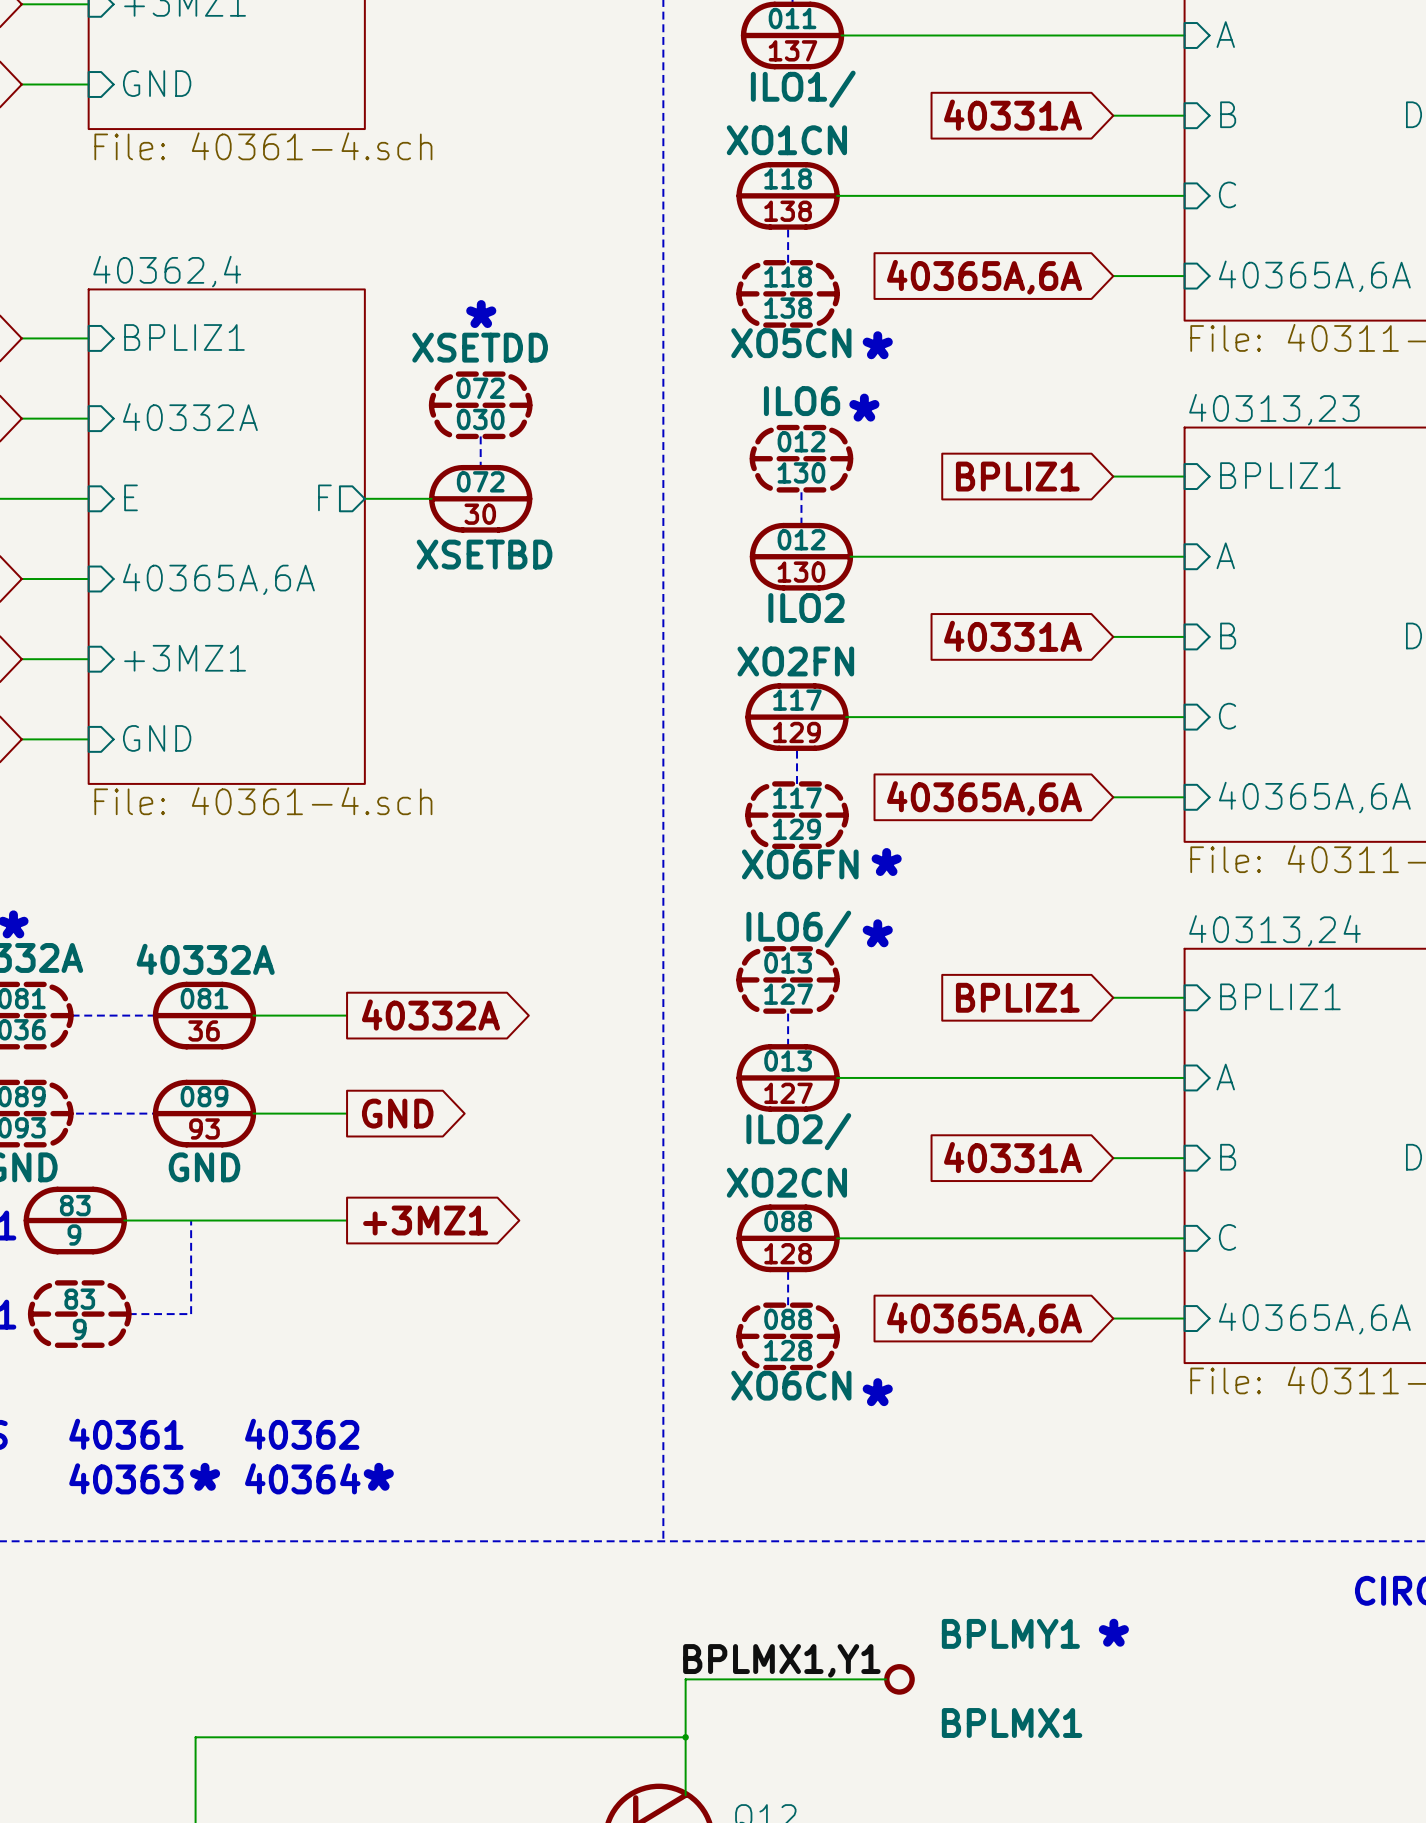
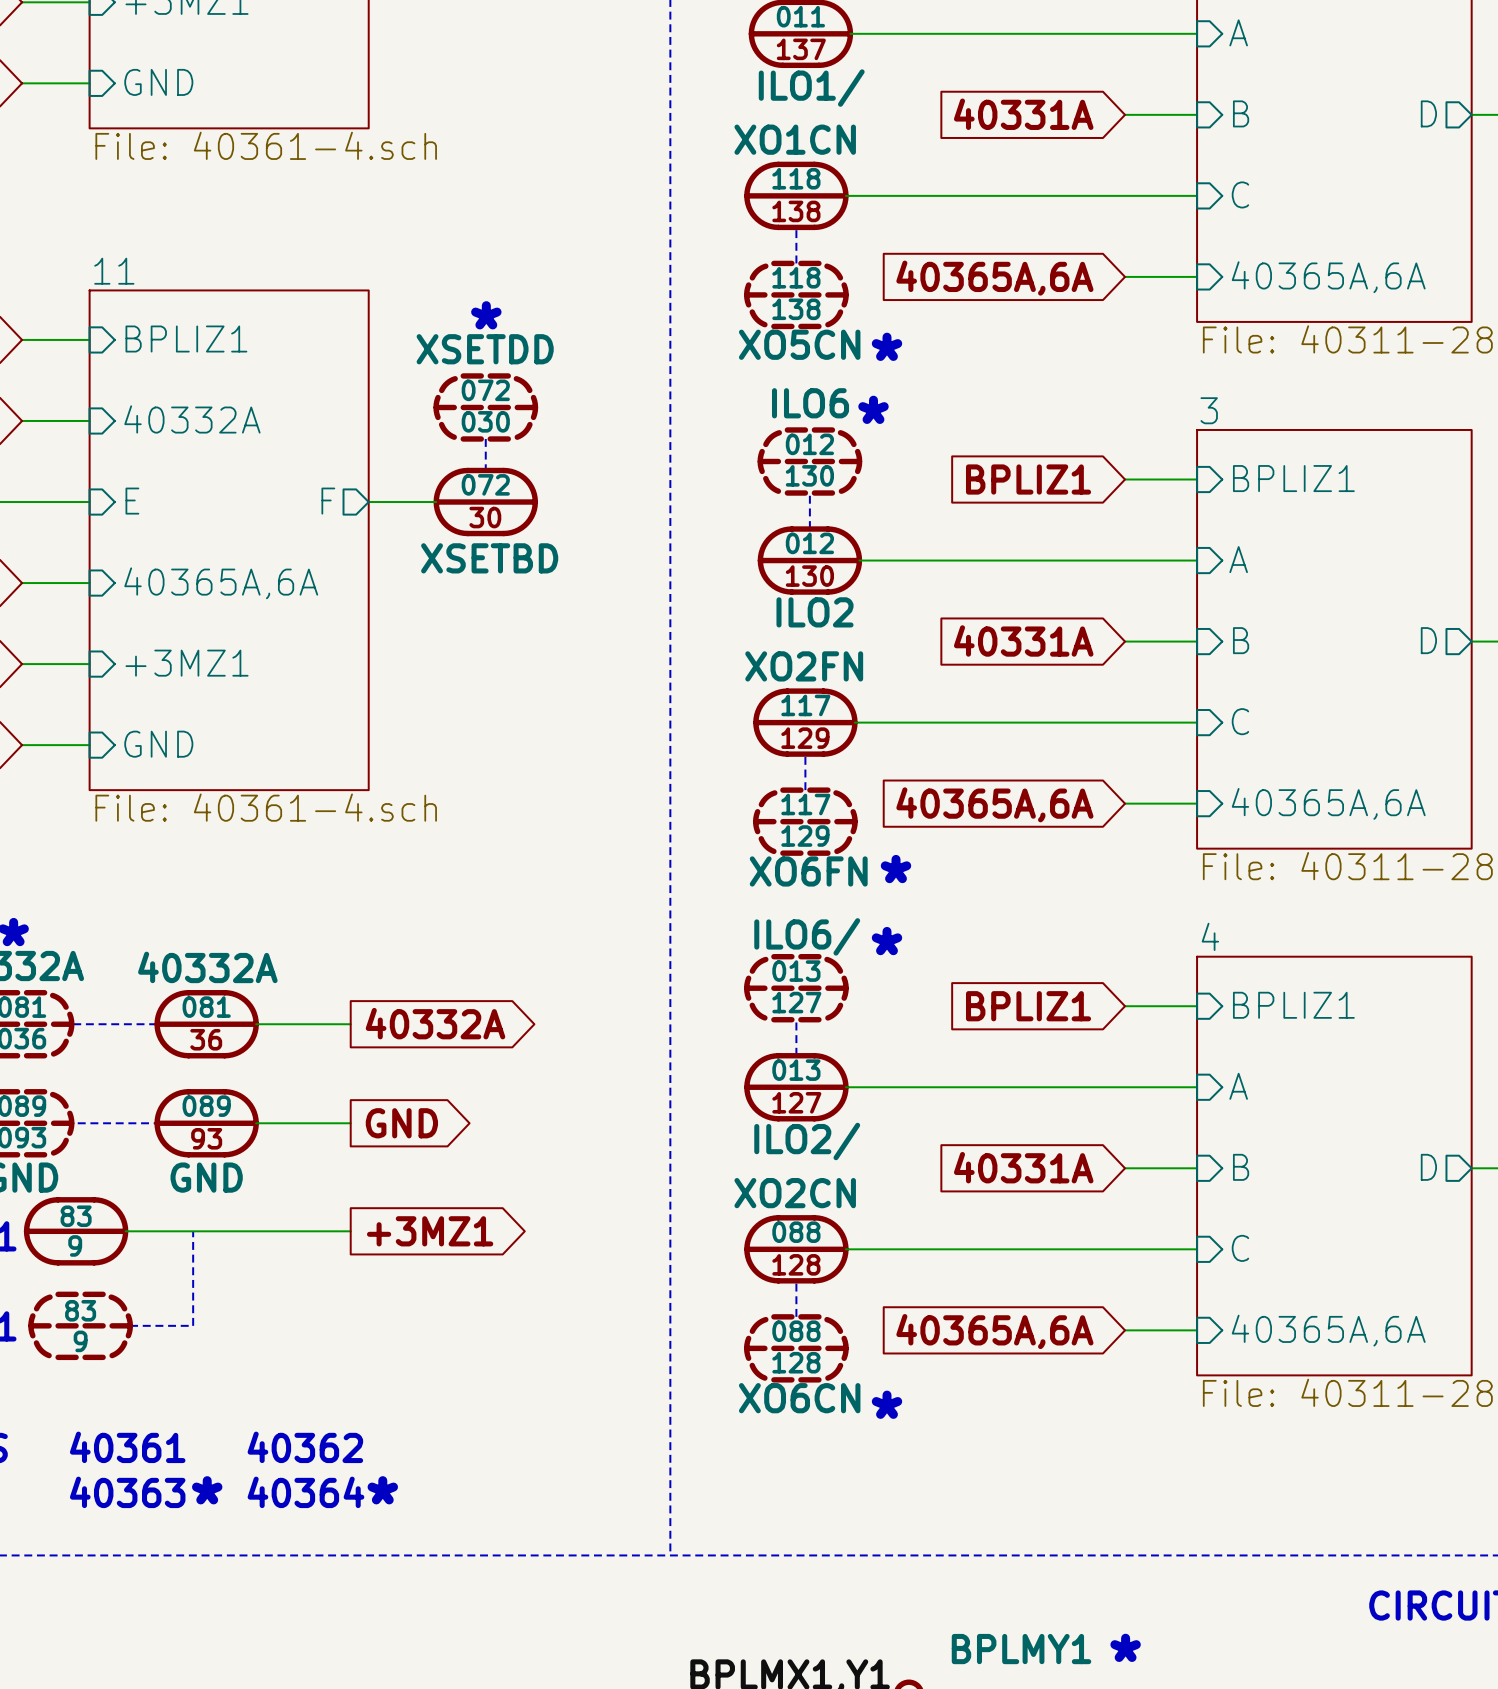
sheet 40362,4 name: 40362,4 (167, 271) -> 11 (114, 271)
sheet 40313,23 name: 40313,23 (1274, 409) -> 3 (1209, 410)
sheet 40313,24 name: 40313,24 (1274, 930) -> 4 (1210, 936)

